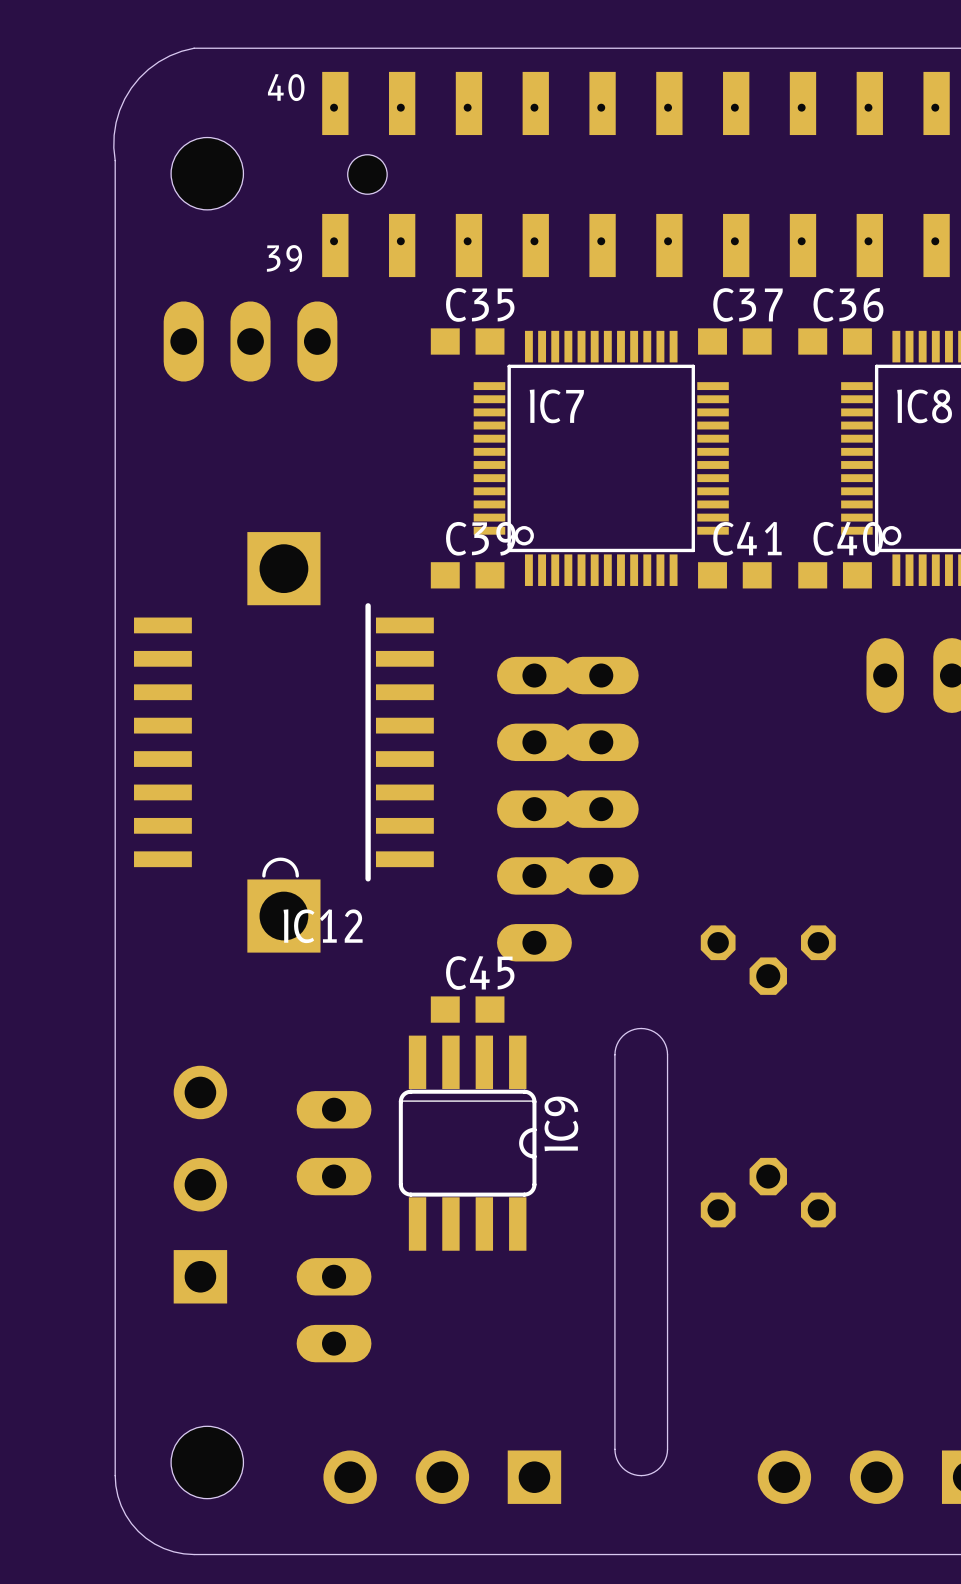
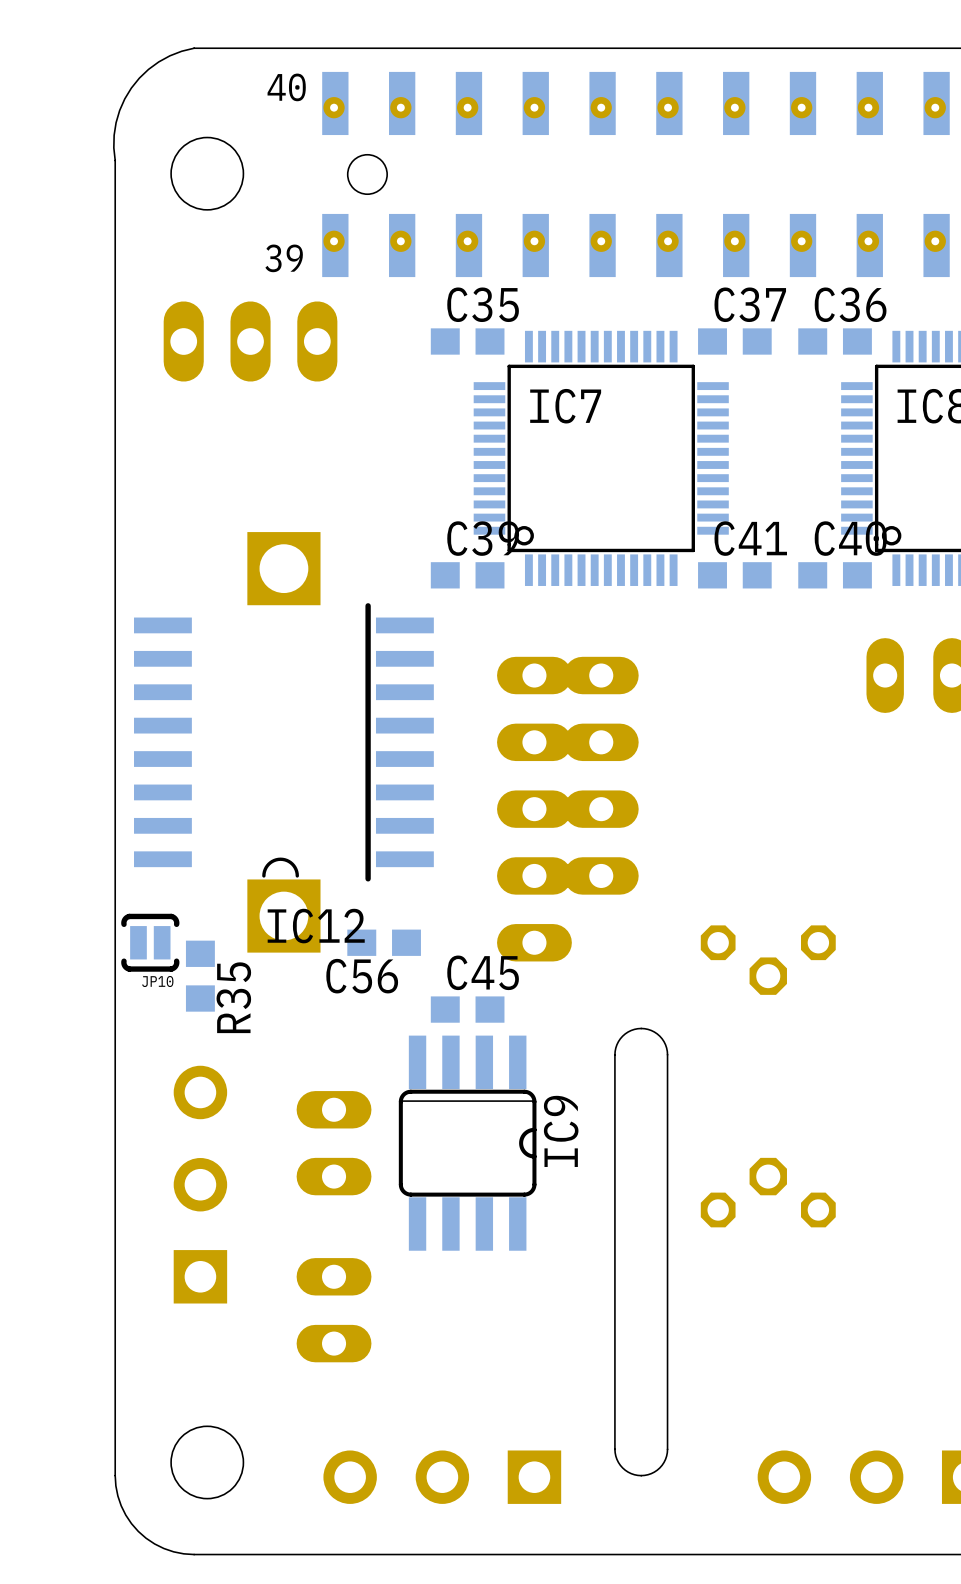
JP10: none -> (150, 942)
C56: none -> (384, 942)
R35: none -> (200, 976)

